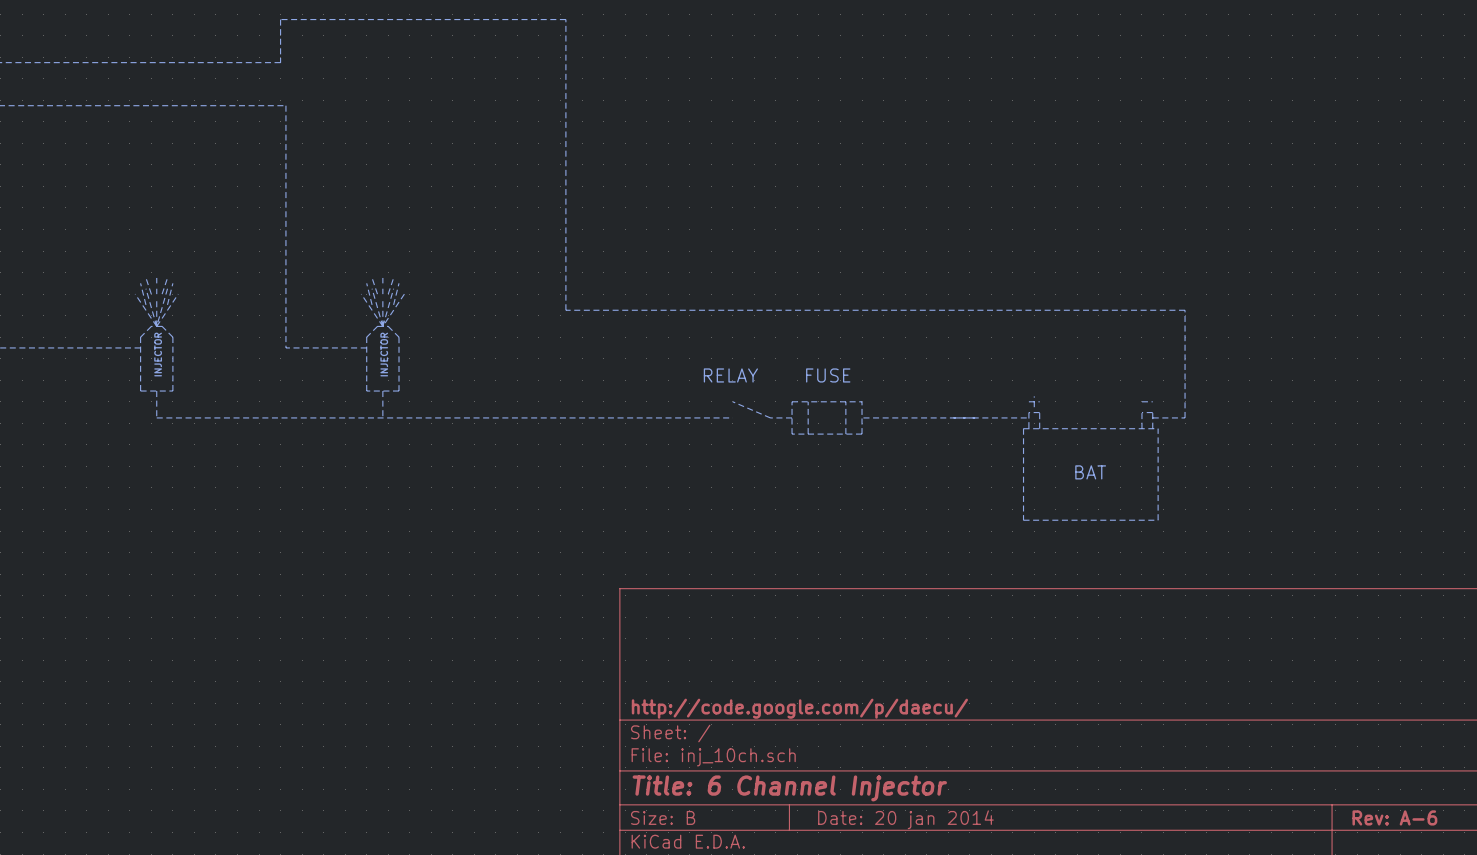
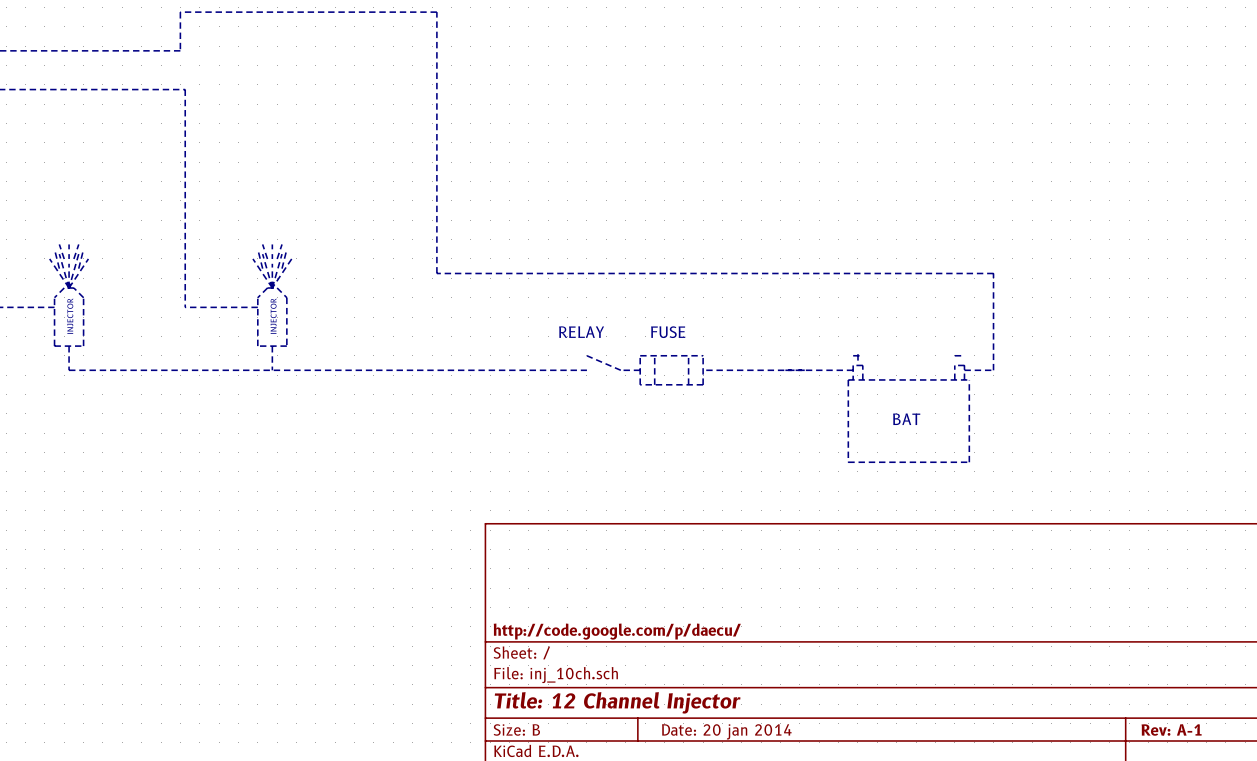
title block: Title: 6 Channel Injector (789, 788) -> Title: 12 Channel Injector (617, 702)
title block: Rev: A-6 (1394, 817) -> Rev: A-1 (1171, 729)

